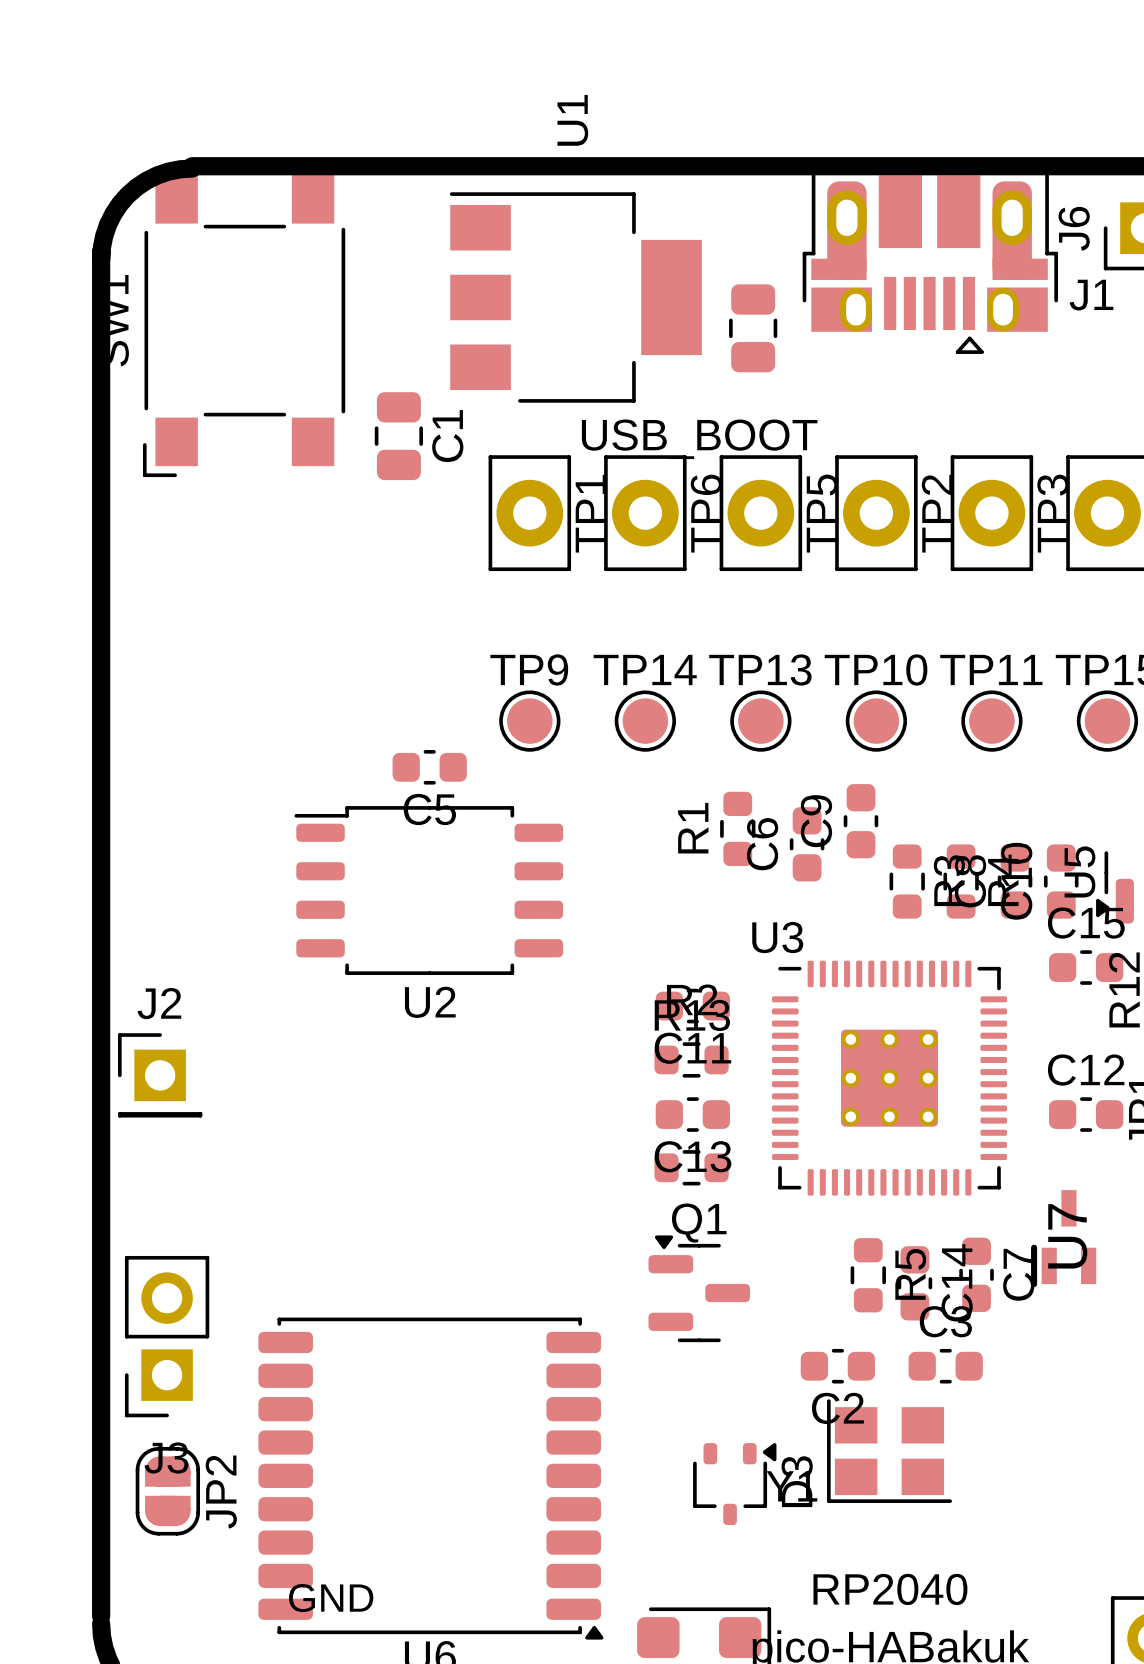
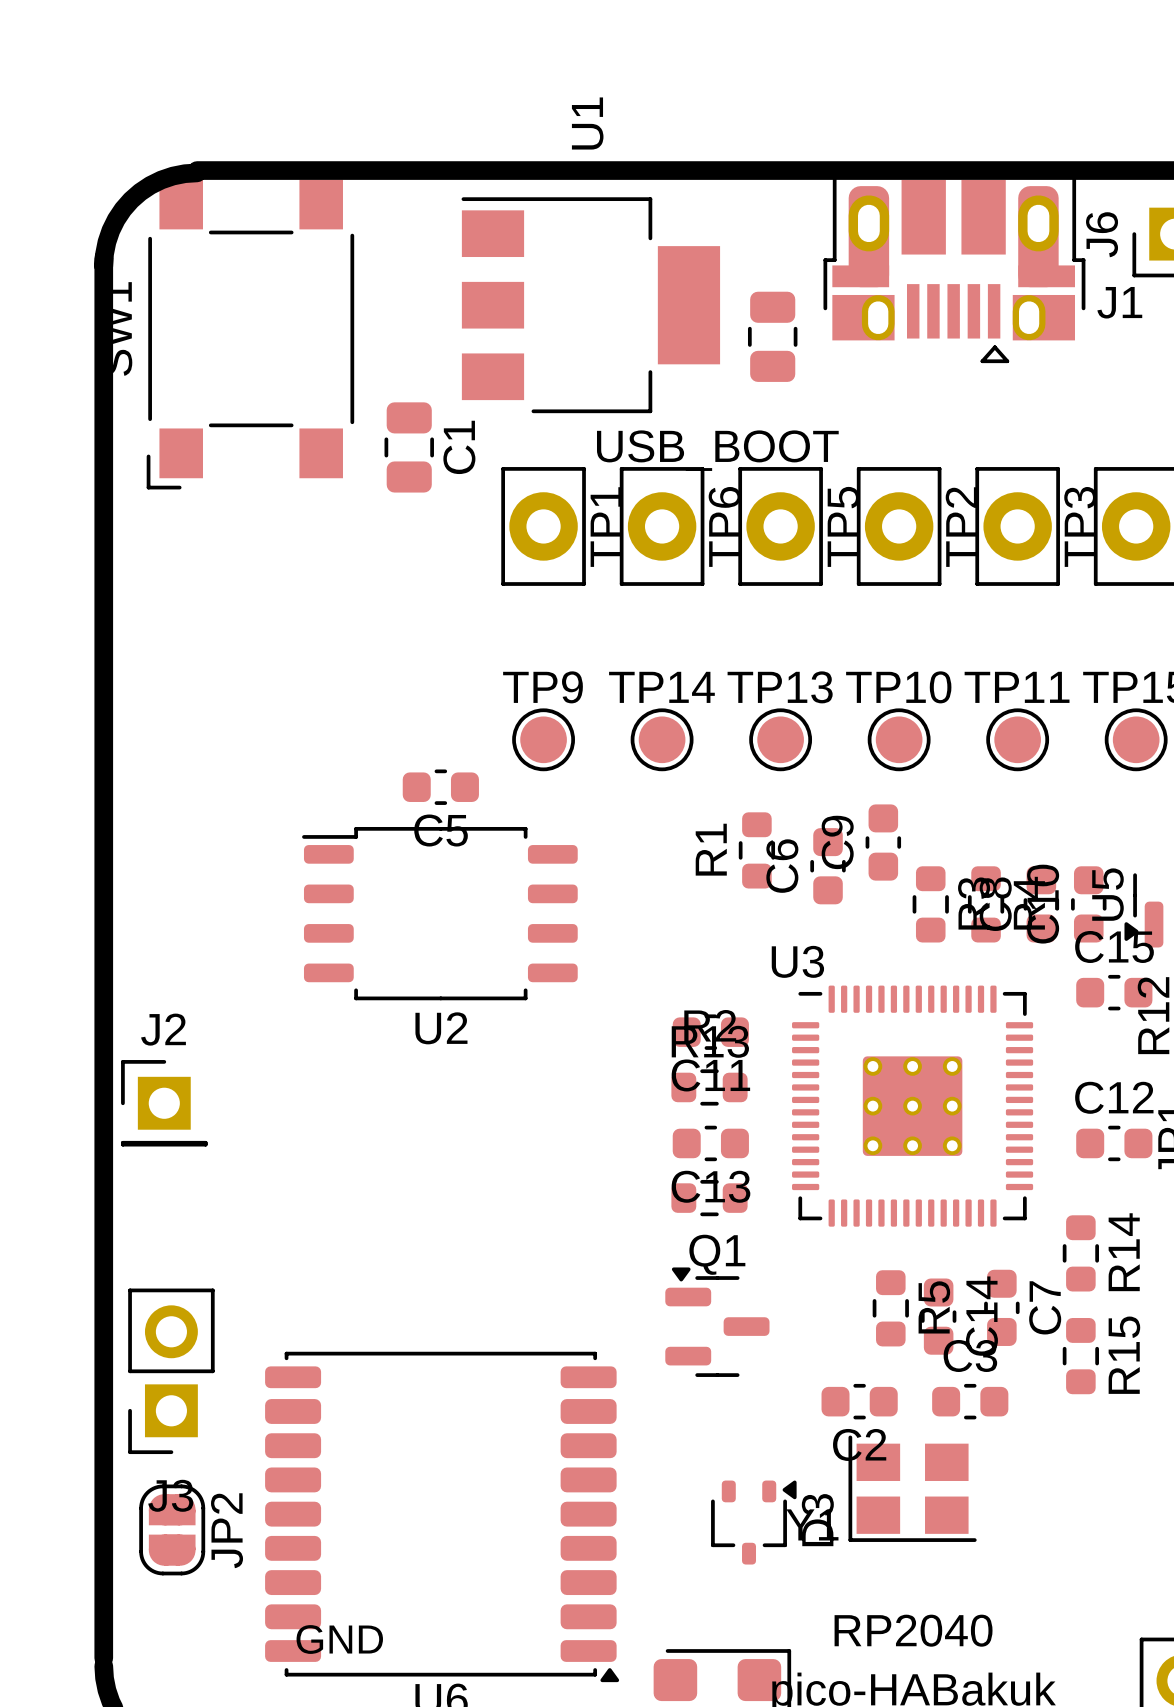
R14: none -> (1080, 1253)
U7: (1063, 1238) -> none
R15: none -> (1080, 1356)

